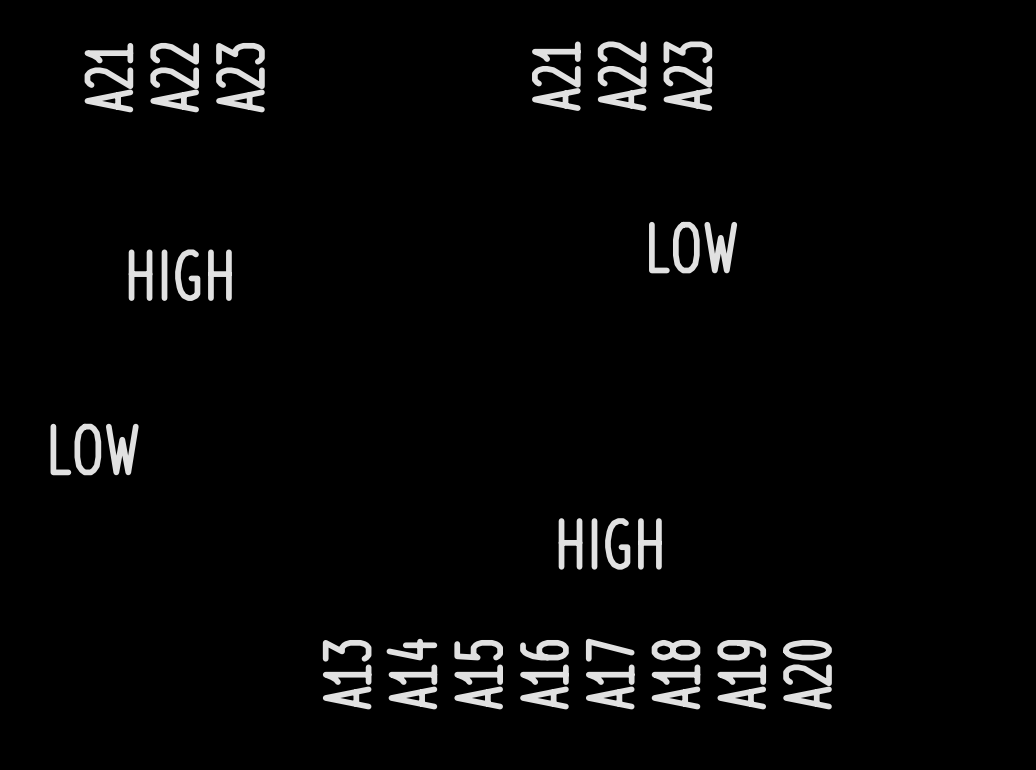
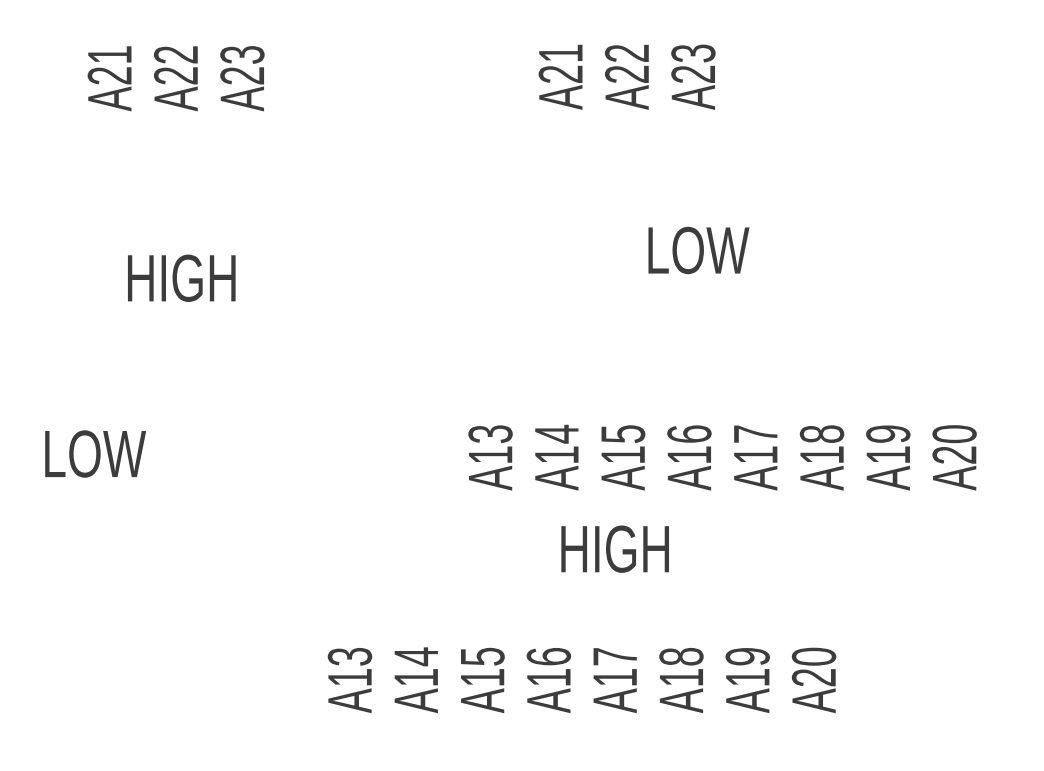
text: none -> A13 (490, 458)
text: none -> A14 (556, 457)
text: none -> A15 (623, 457)
text: none -> A16 (689, 458)
text: none -> A17 (755, 458)
text: none -> A18 (822, 458)
text: none -> A19 (888, 458)
text: none -> A20 (954, 457)

